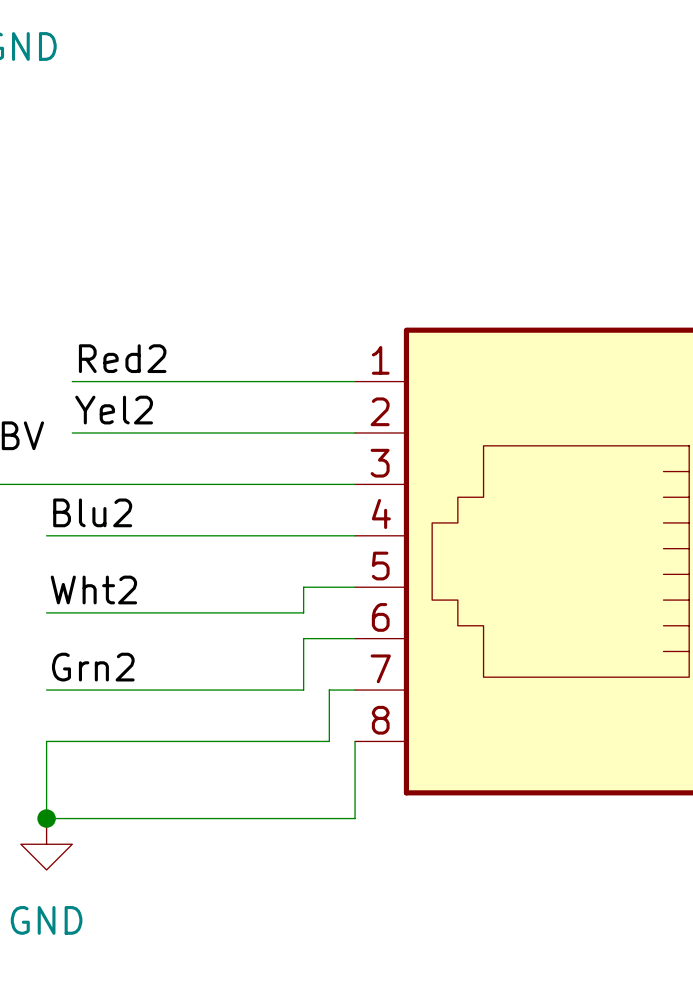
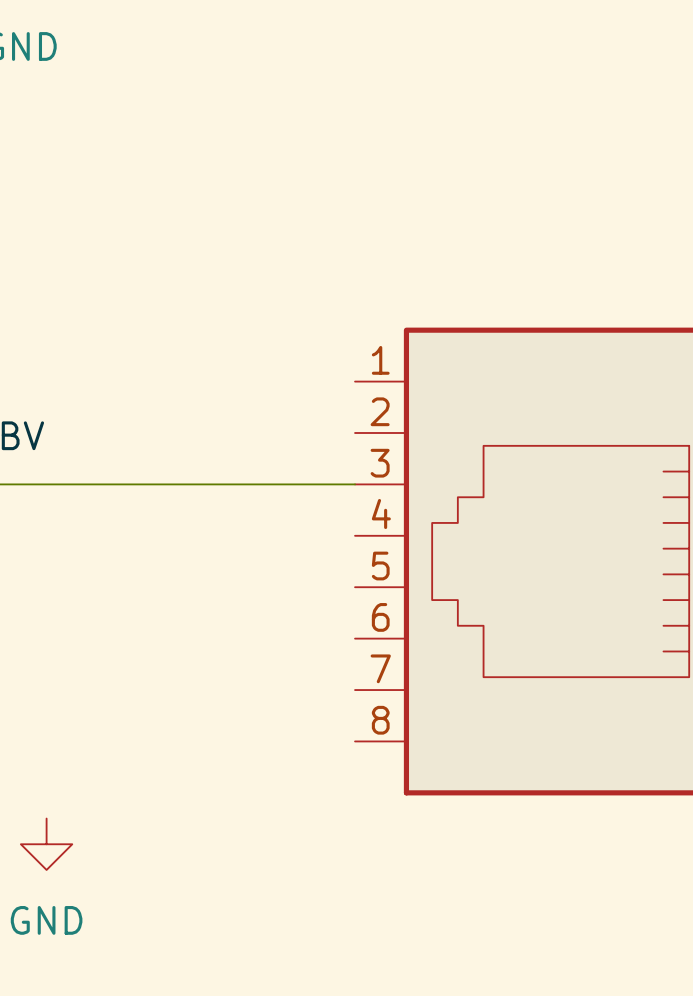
label: Red2 (122, 358) -> none
wire: (72, 381) (355, 381) -> none
label: Yel2 (114, 410) -> none
wire: (72, 432) (355, 432) -> none
label: Blu2 (92, 512) -> none
wire: (46, 535) (355, 535) -> none
wire: (355, 587) (303, 587) (303, 612) (46, 612) -> none
label: Wht2 (93, 589) -> none
wire: (355, 638) (303, 638) (303, 690) (46, 690) -> none
label: Grn2 (93, 667) -> none
wire: (355, 690) (329, 690) (329, 741) (46, 741) (46, 818) (355, 818) (355, 741) -> none
junction: (46, 818) -> none

